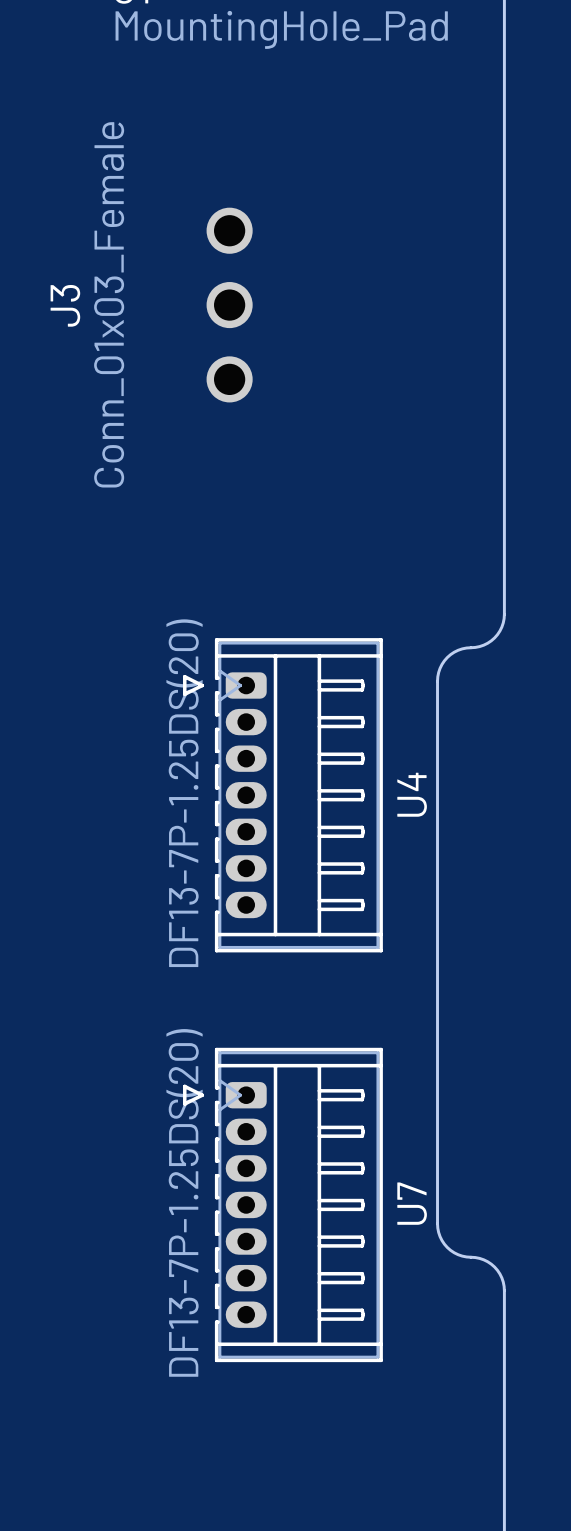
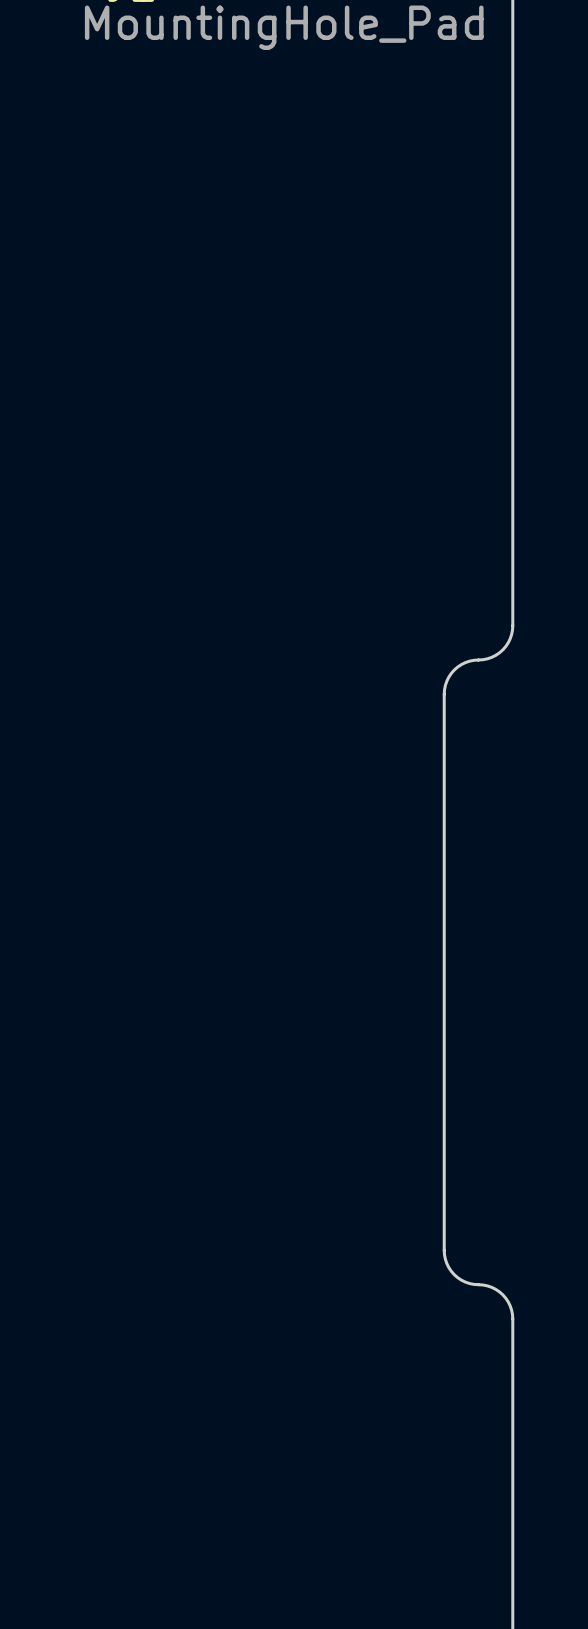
J3: Conn_01x03_Female (229, 305) -> none
U4: DF13-7P-1.25DS(20) (282, 795) -> none
U7: DF13-7P-1.25DS(20) (282, 1204) -> none

